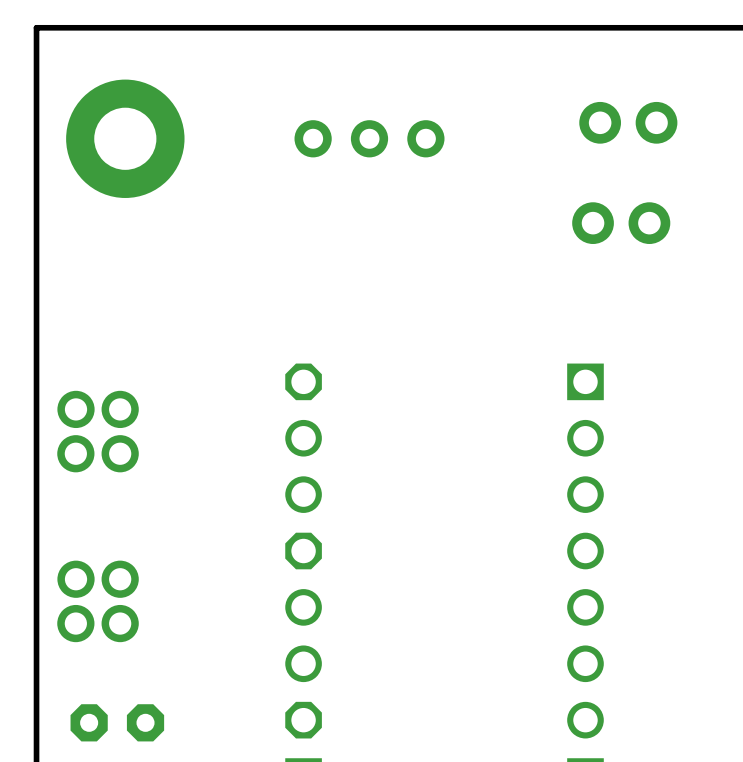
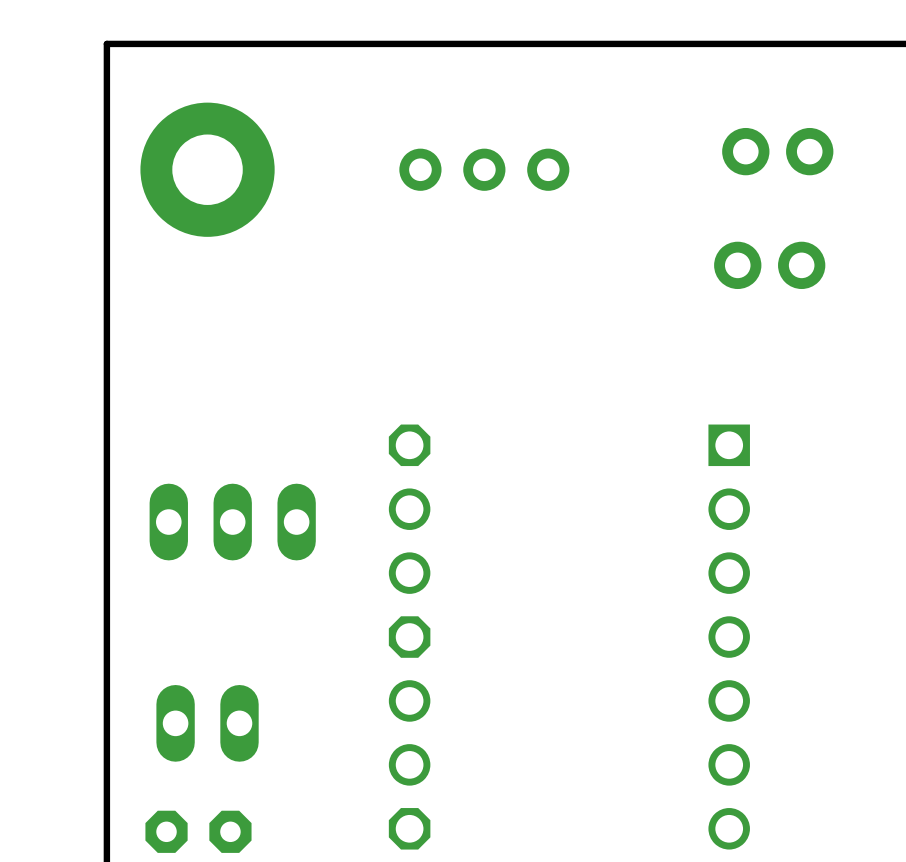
part: (98, 431) -> none
part: none -> (232, 522)
part: (98, 601) -> none
part: none -> (207, 723)

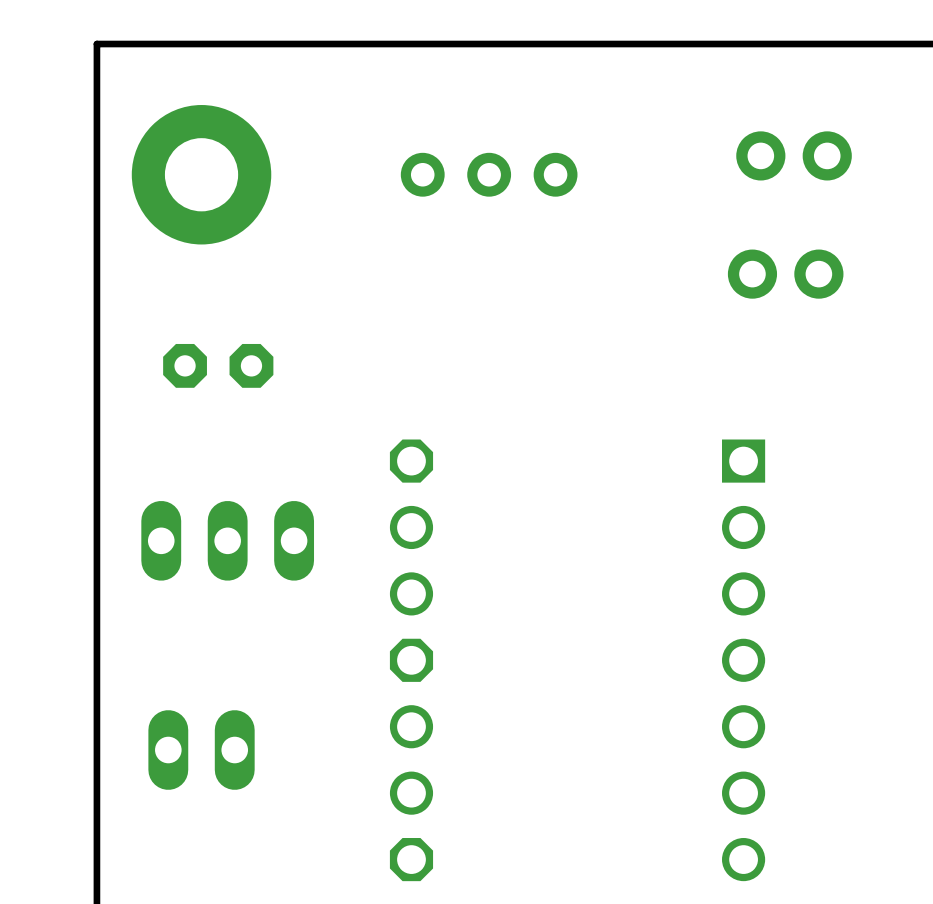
part position: (198, 831) -> (218, 365)

